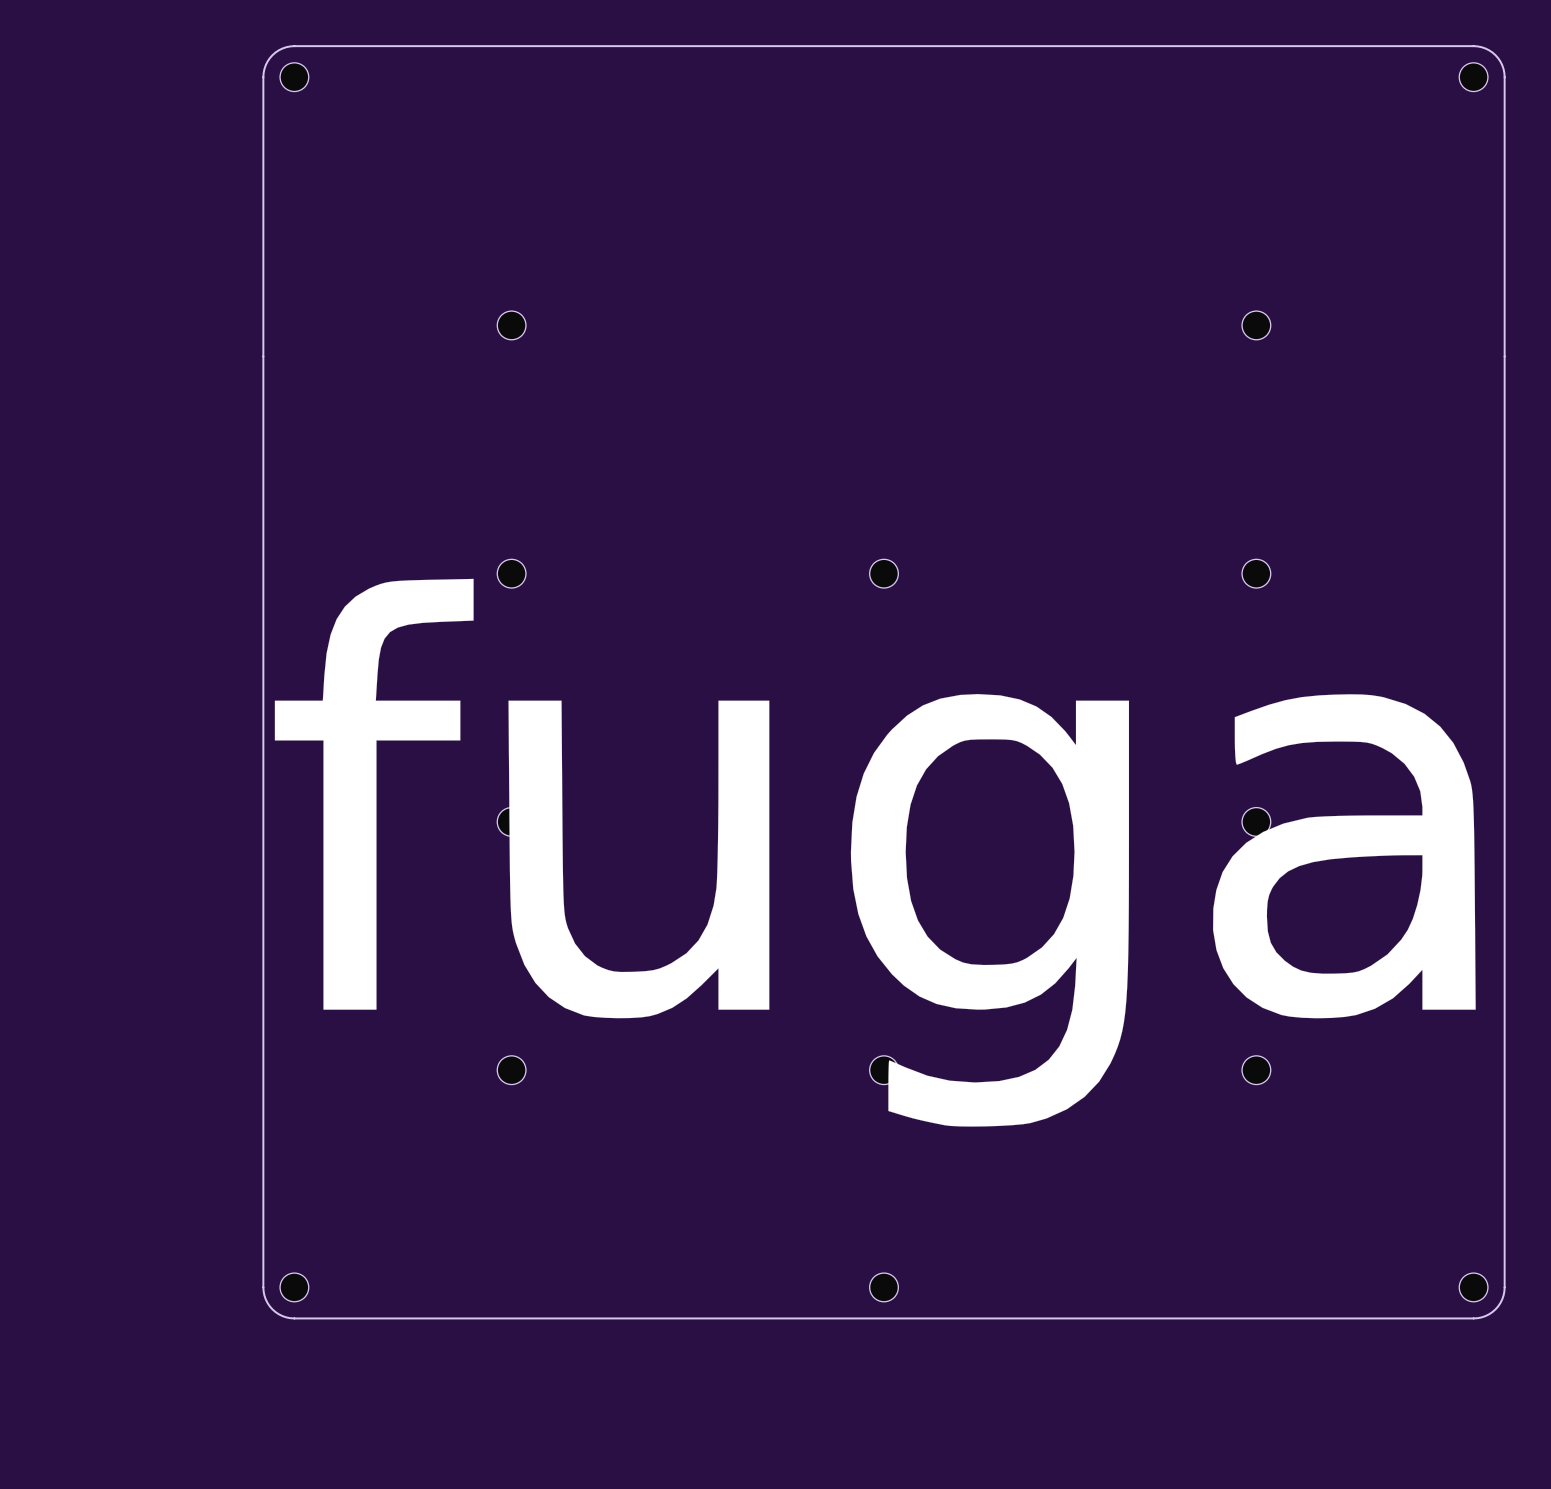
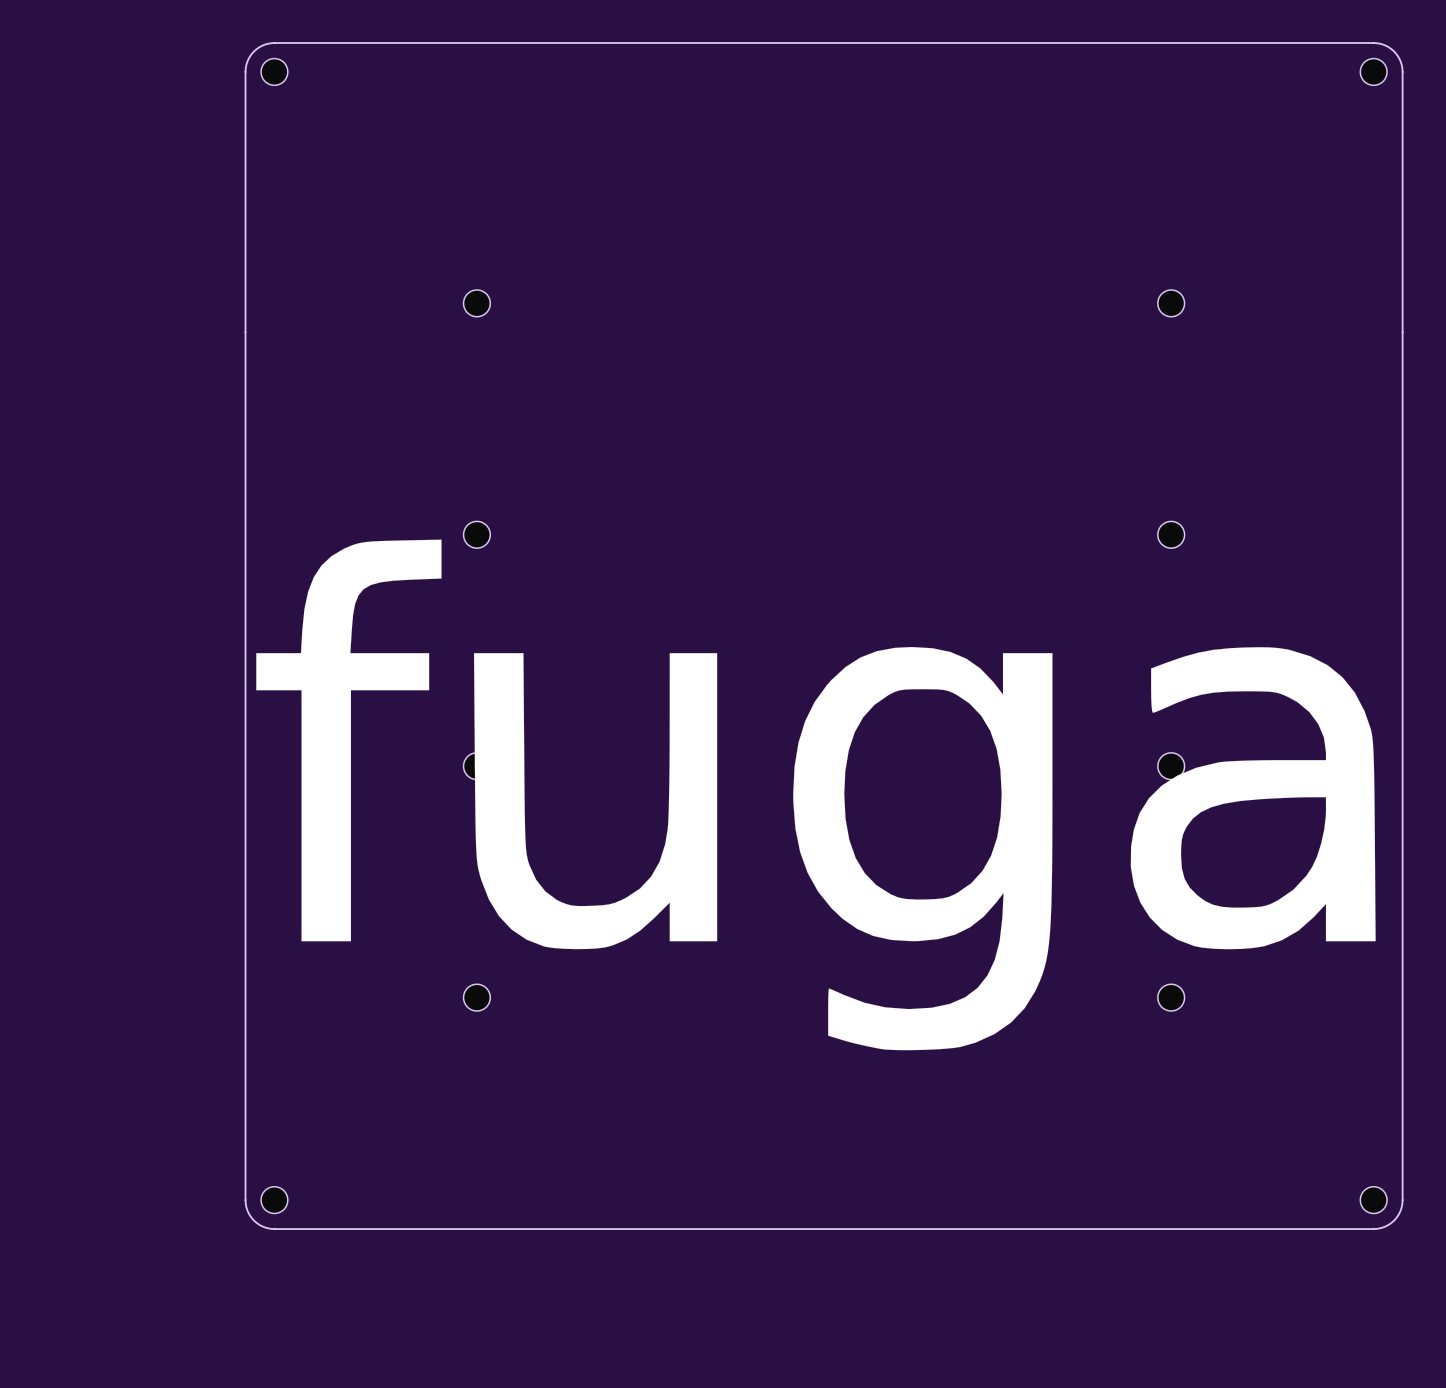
part: (884, 573) -> none
part: (884, 1070) -> none
part: (884, 1287) -> none

